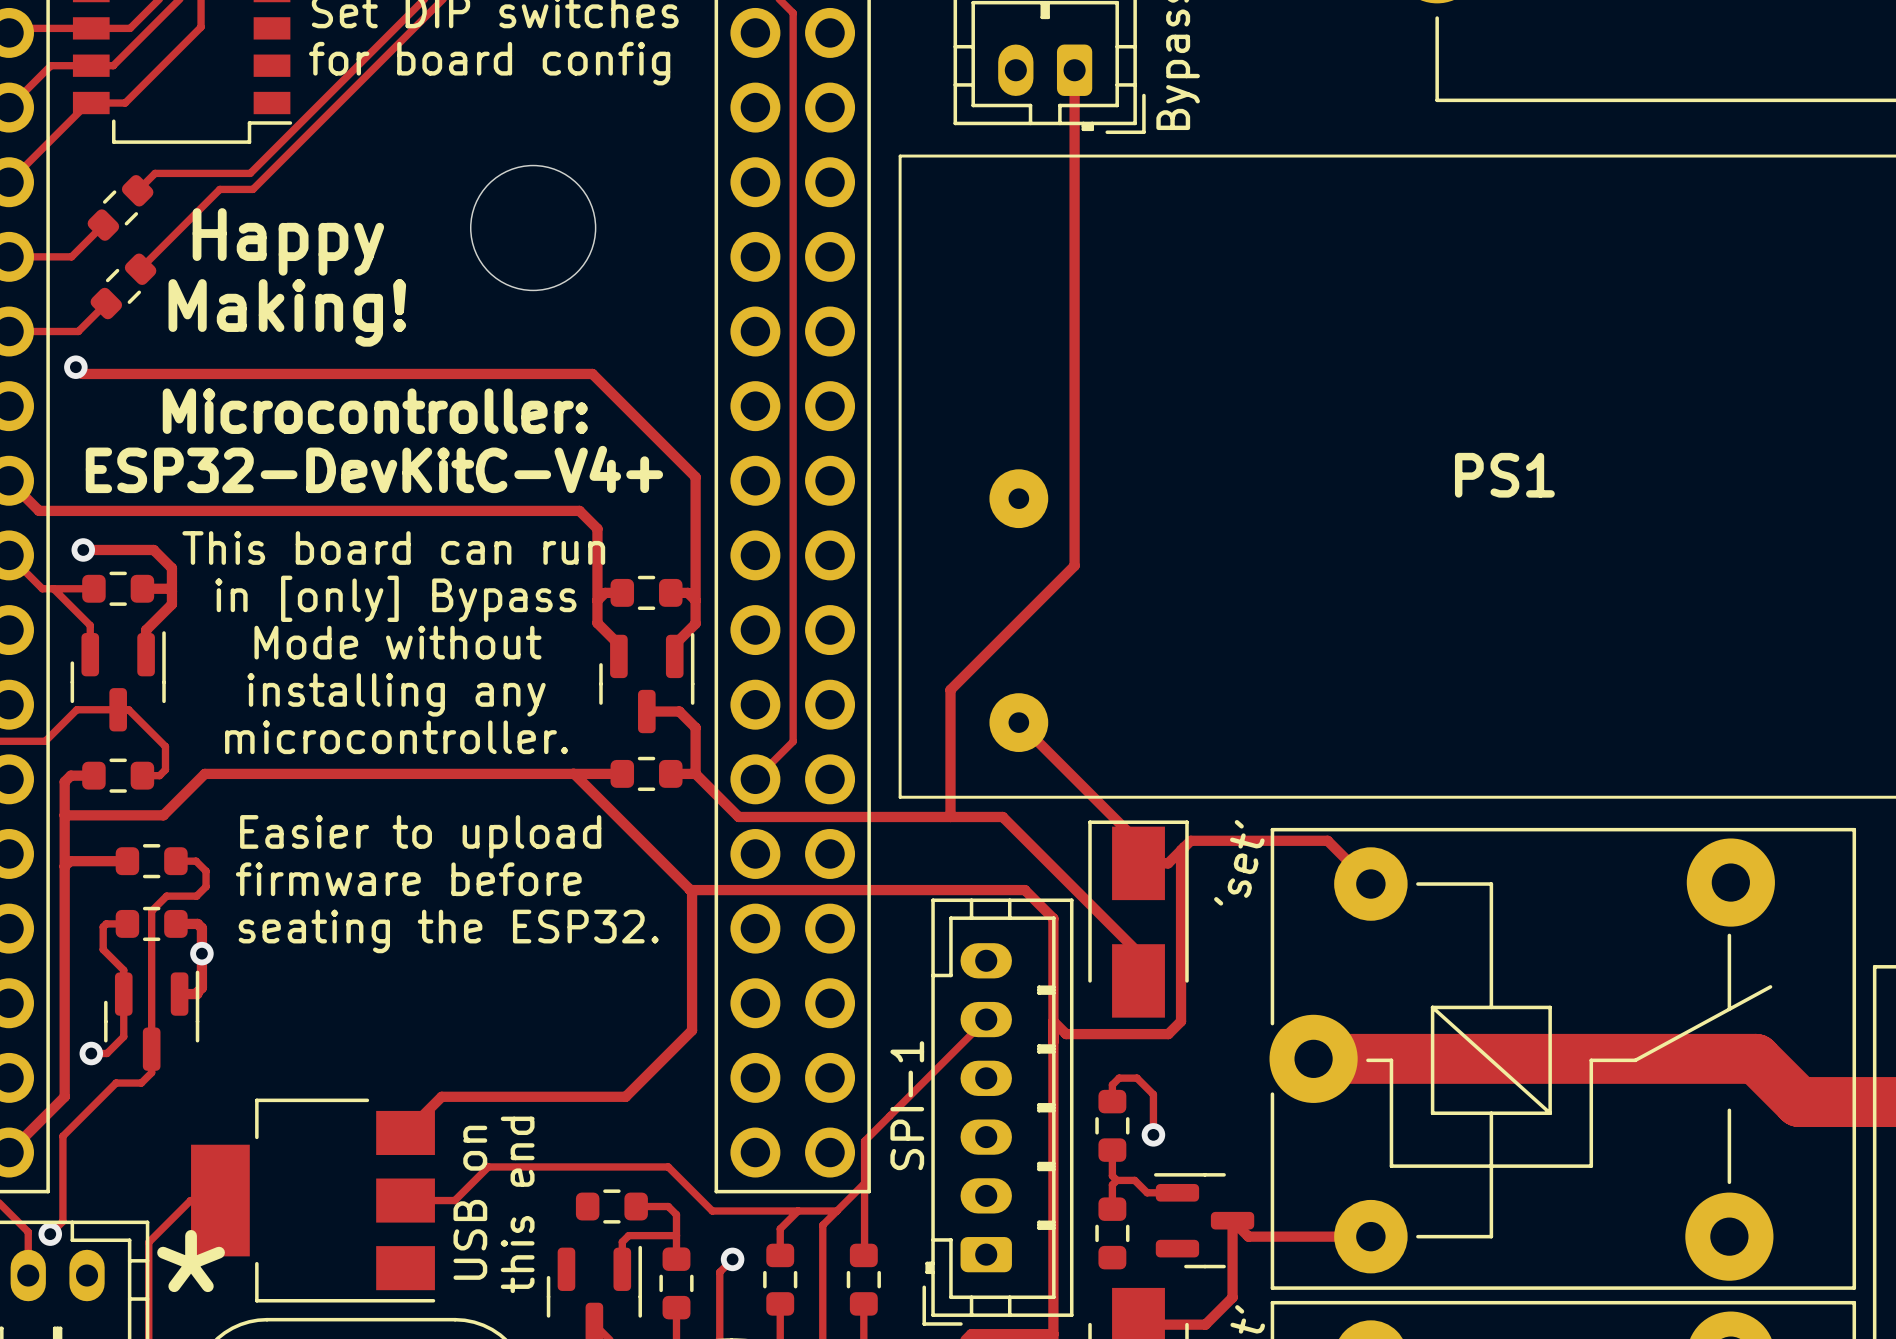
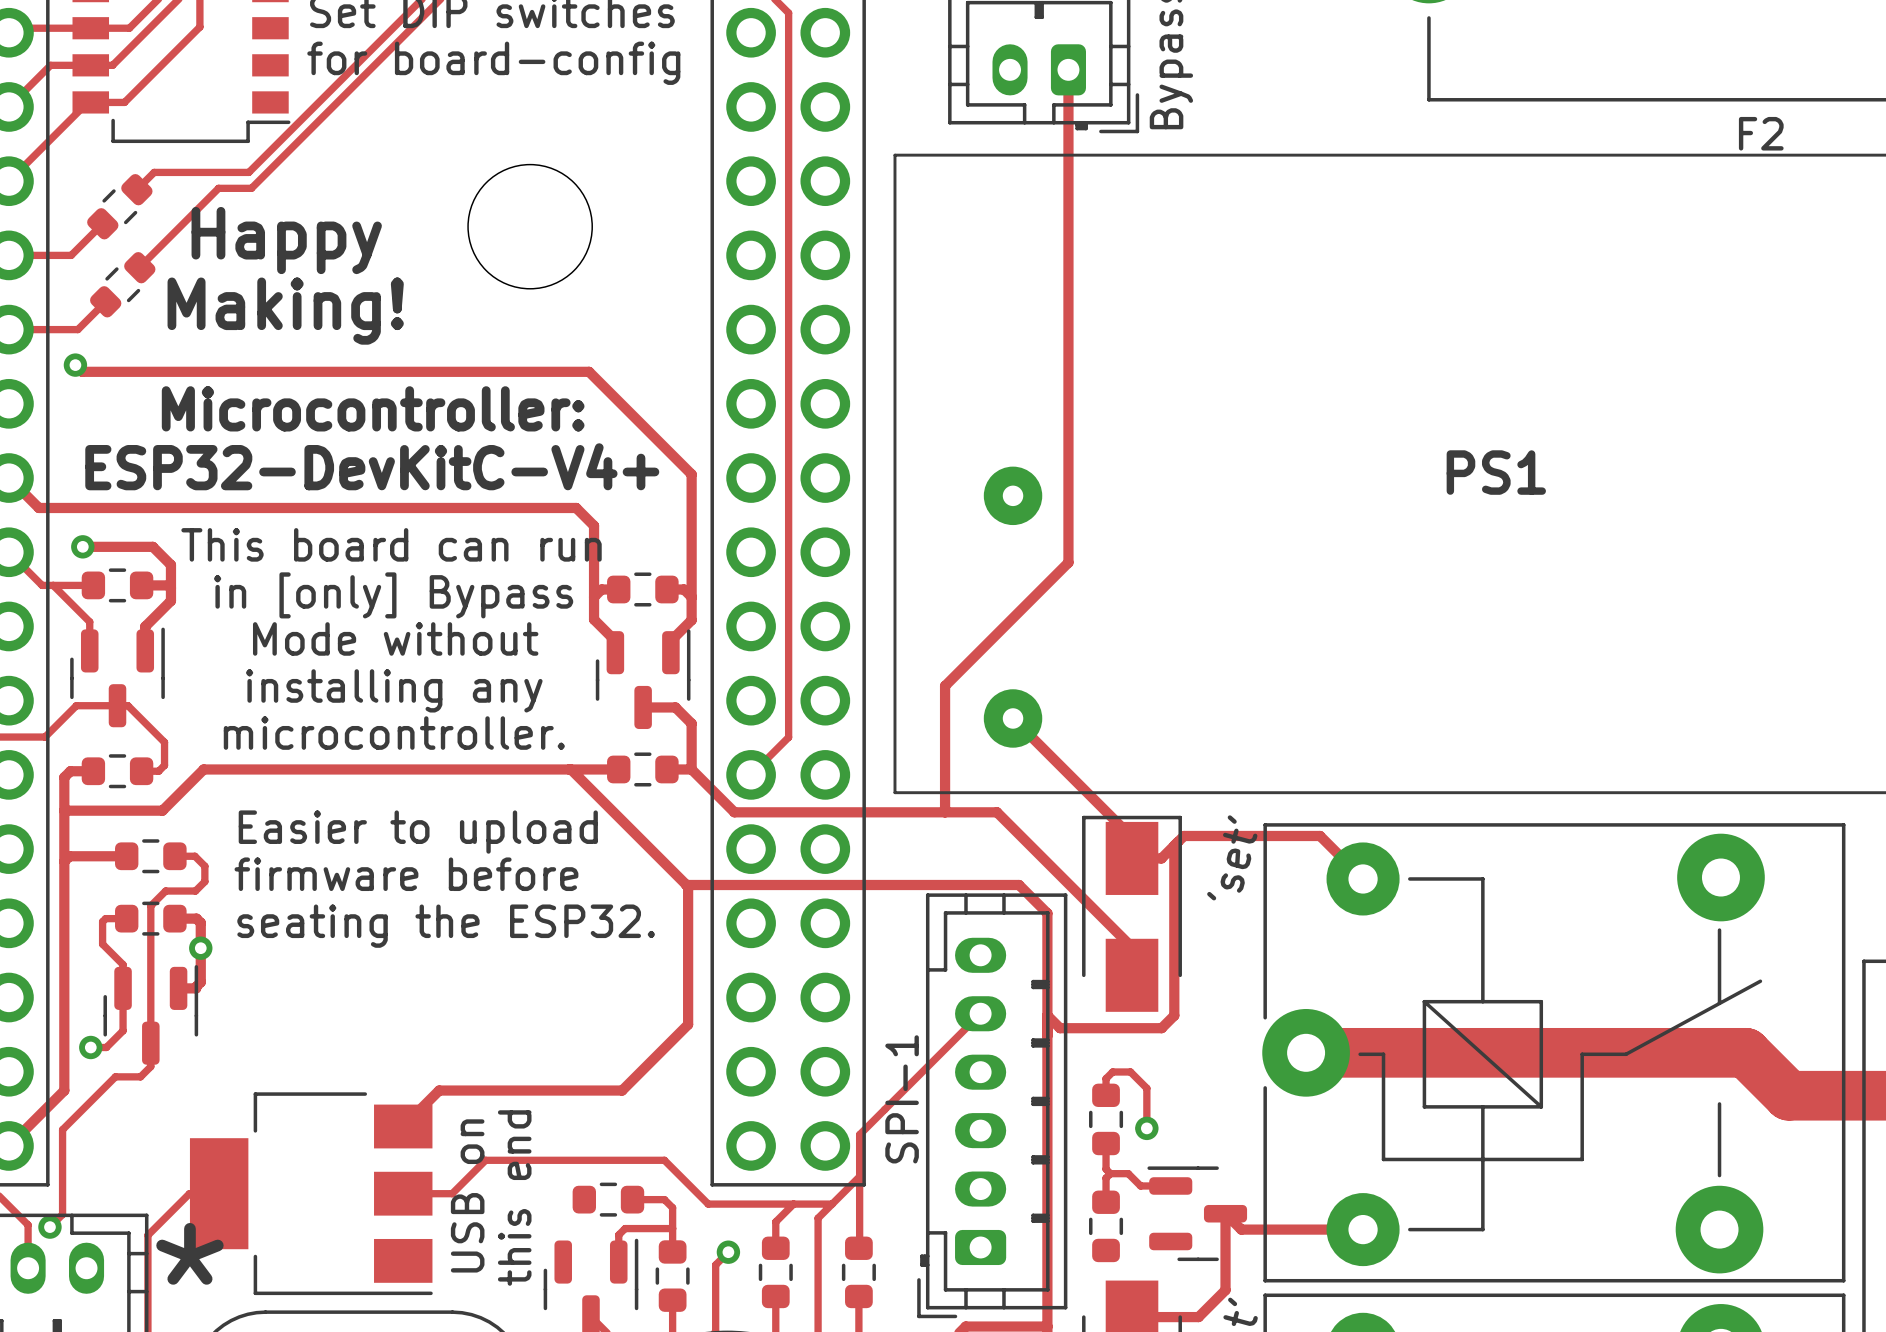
text: for board config (489, 63) -> for board-config (493, 63)
F2 name: none -> F2 (1761, 133)

